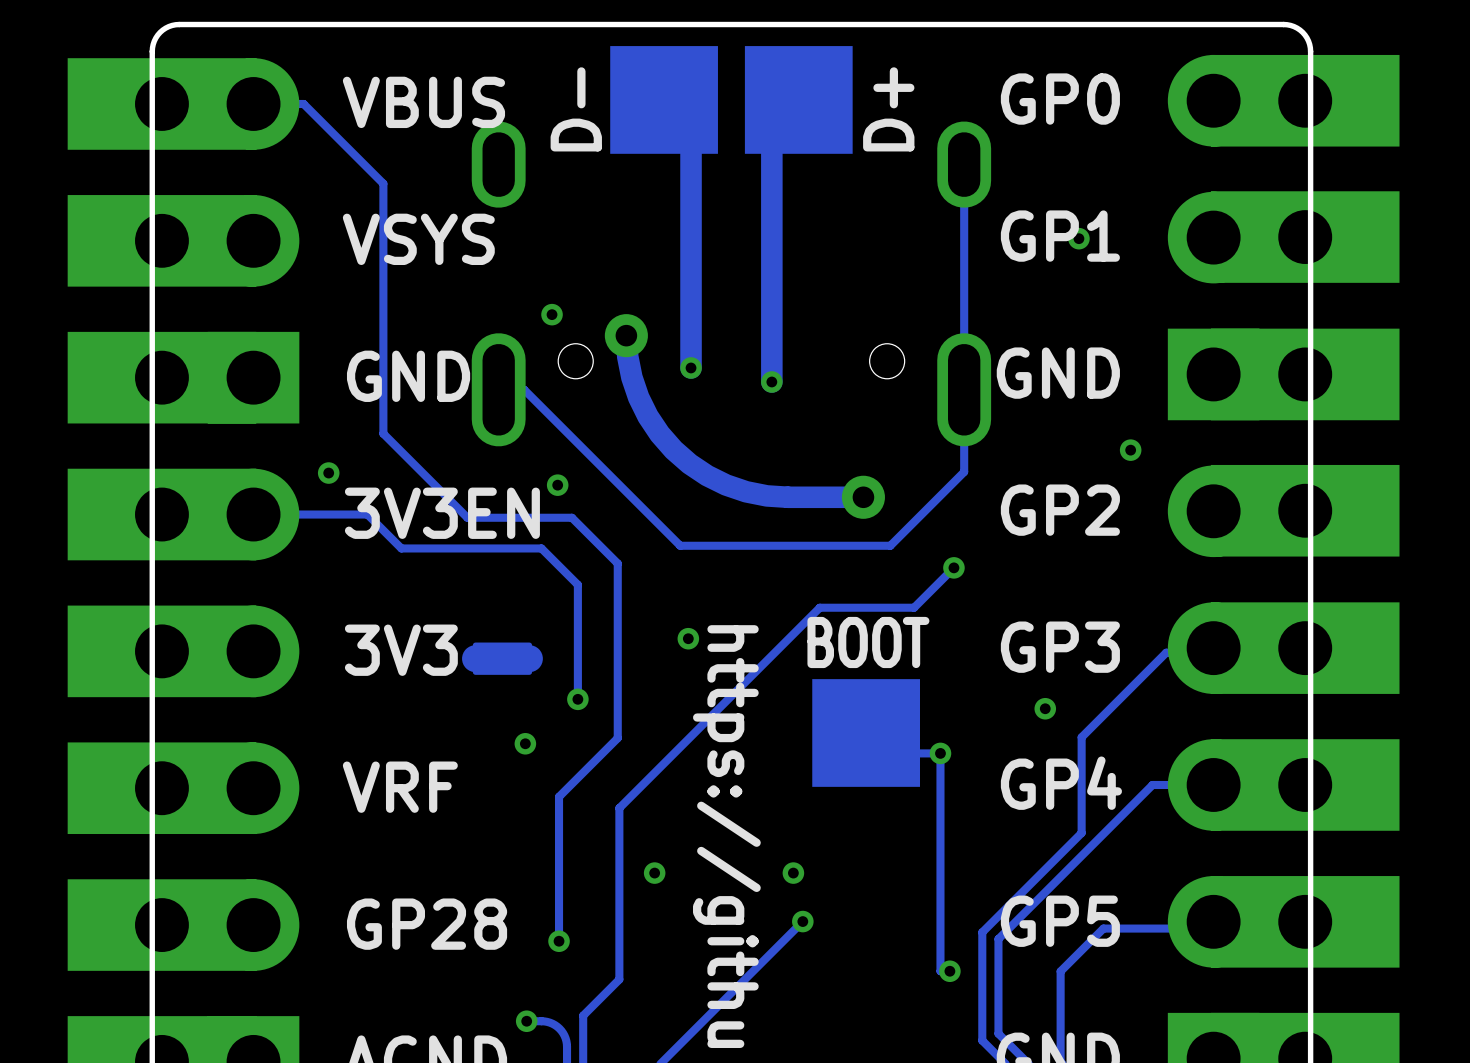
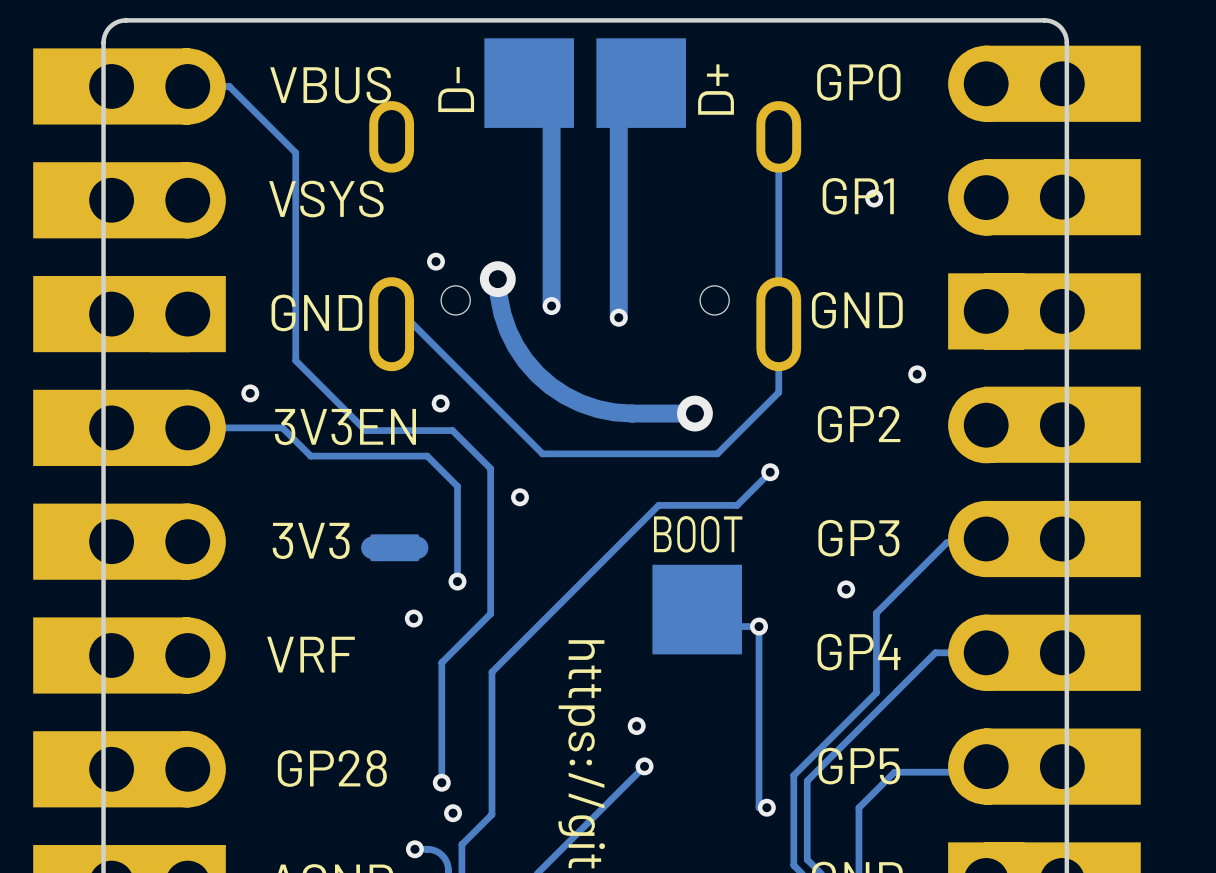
via position: (688, 638) -> (519, 497)
via position: (654, 873) -> (453, 813)

